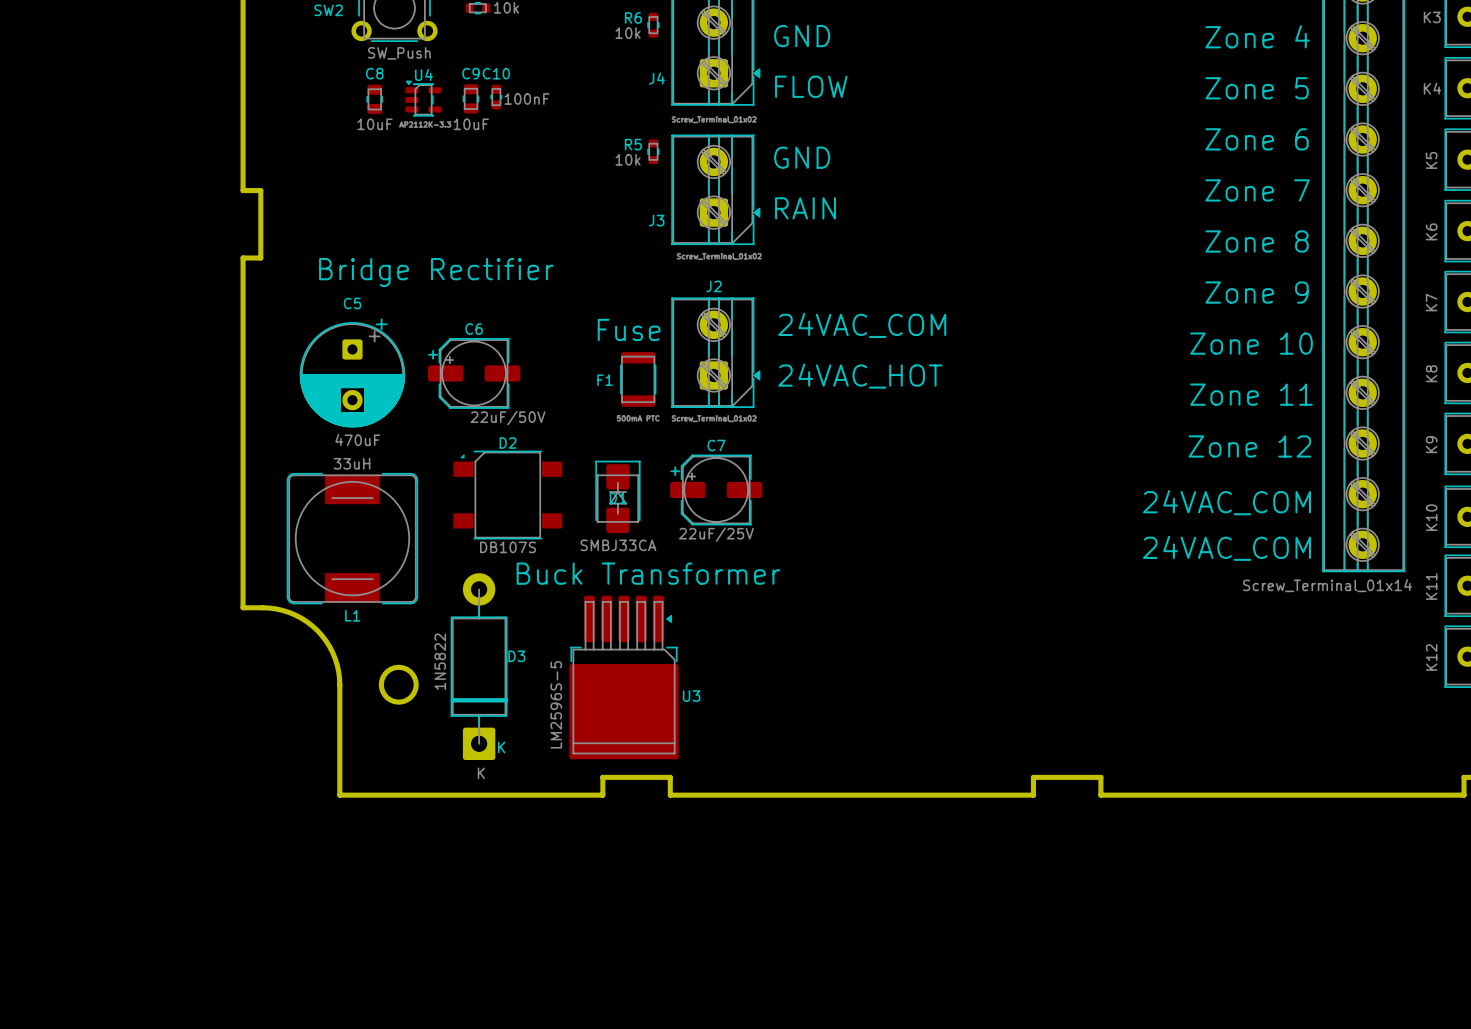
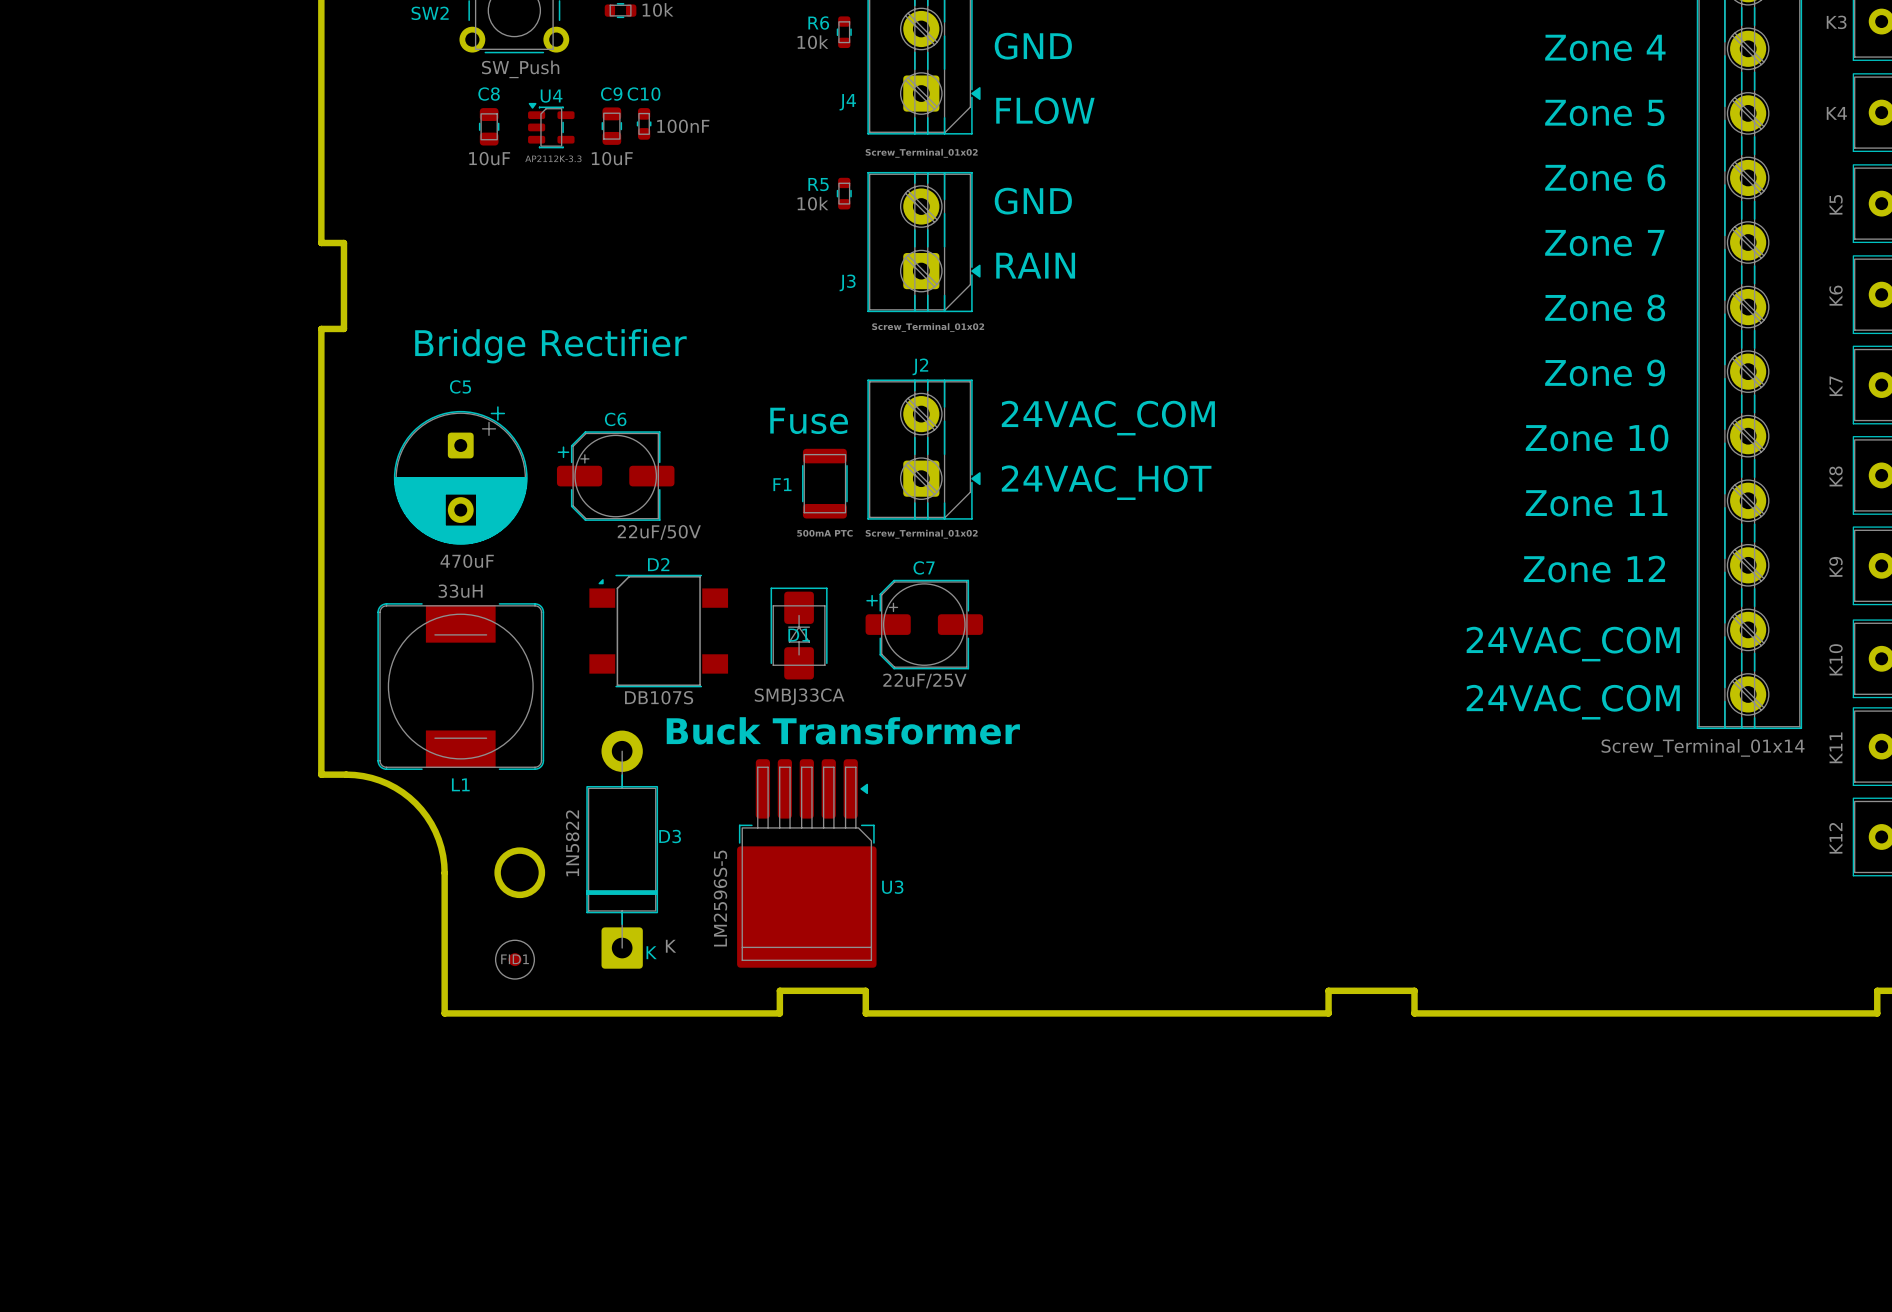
FID1: none -> (514, 959)
D3 text position: K (481, 773) -> K (671, 946)

